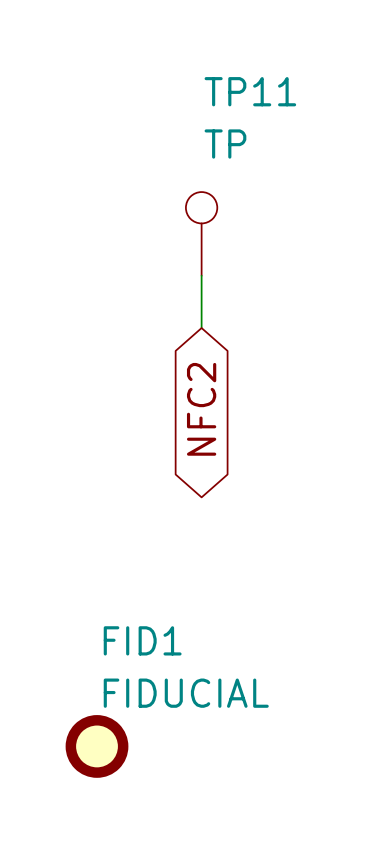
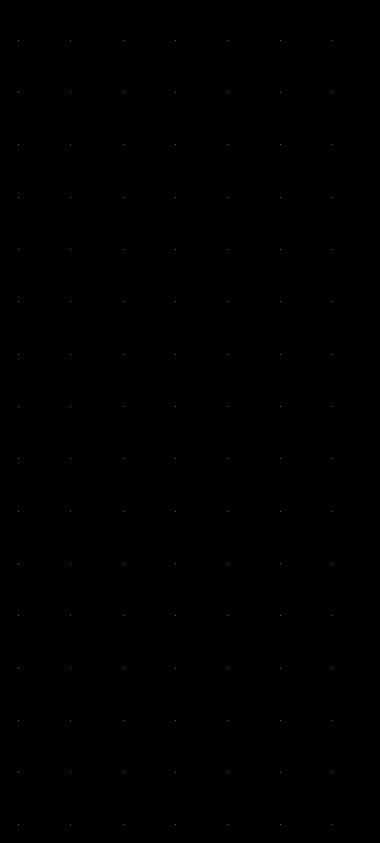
TP11: TP (201, 233) -> none
wire: (201, 275) (201, 328) -> none
global label: NFC2 (201, 409) -> none
FID1: FIDUCIAL (97, 746) -> none

